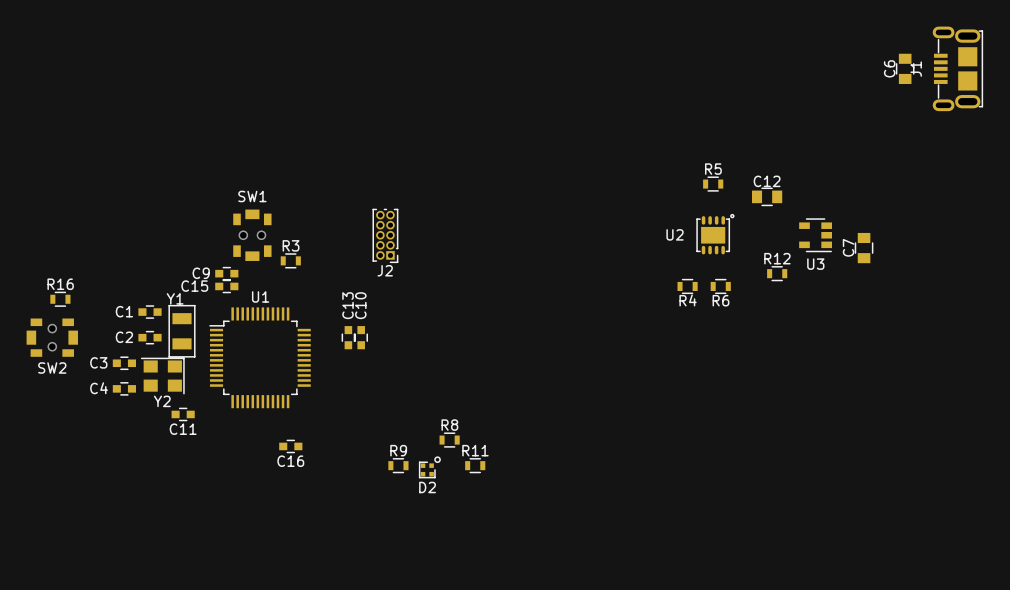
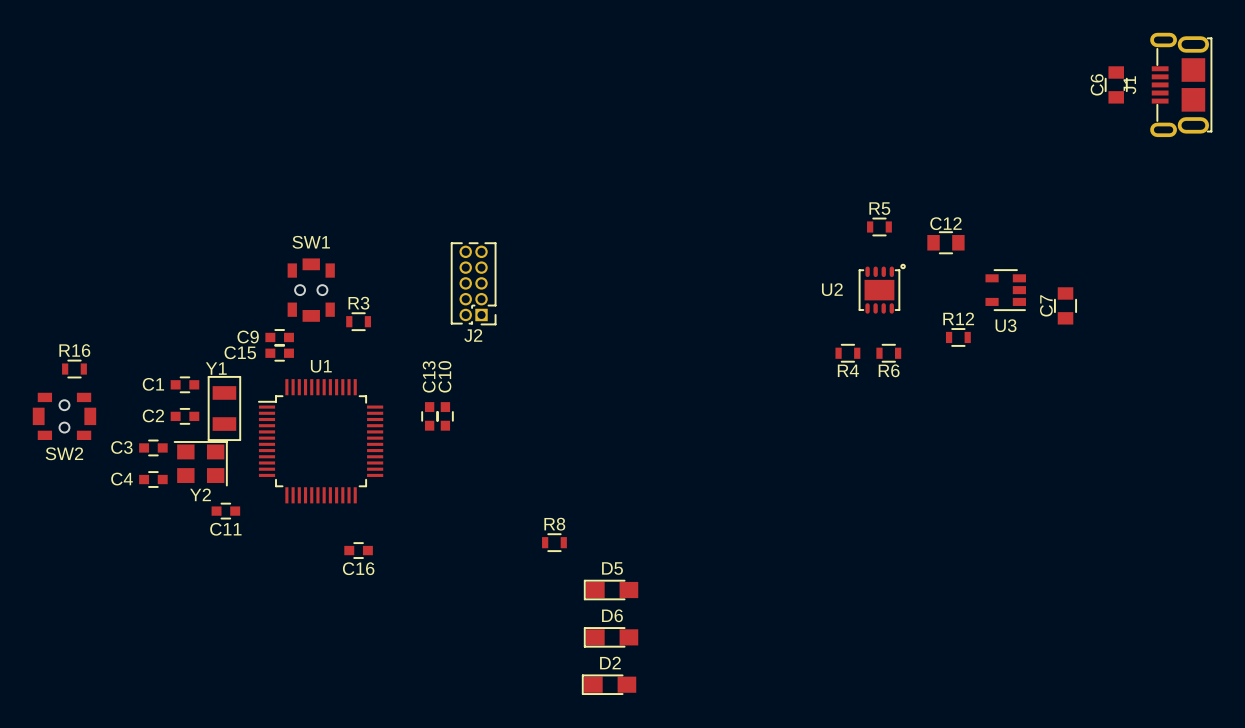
J2 footprint: [372, 208, 399, 263] -> [450, 242, 497, 326]
D2 footprint: [418, 456, 441, 479] -> [582, 674, 637, 695]
R9: (398, 465) -> none
R11: (475, 465) -> none
D5: none -> (611, 590)
D2 name position: D2 (427, 487) -> D2 (610, 663)
D6: none -> (611, 637)

